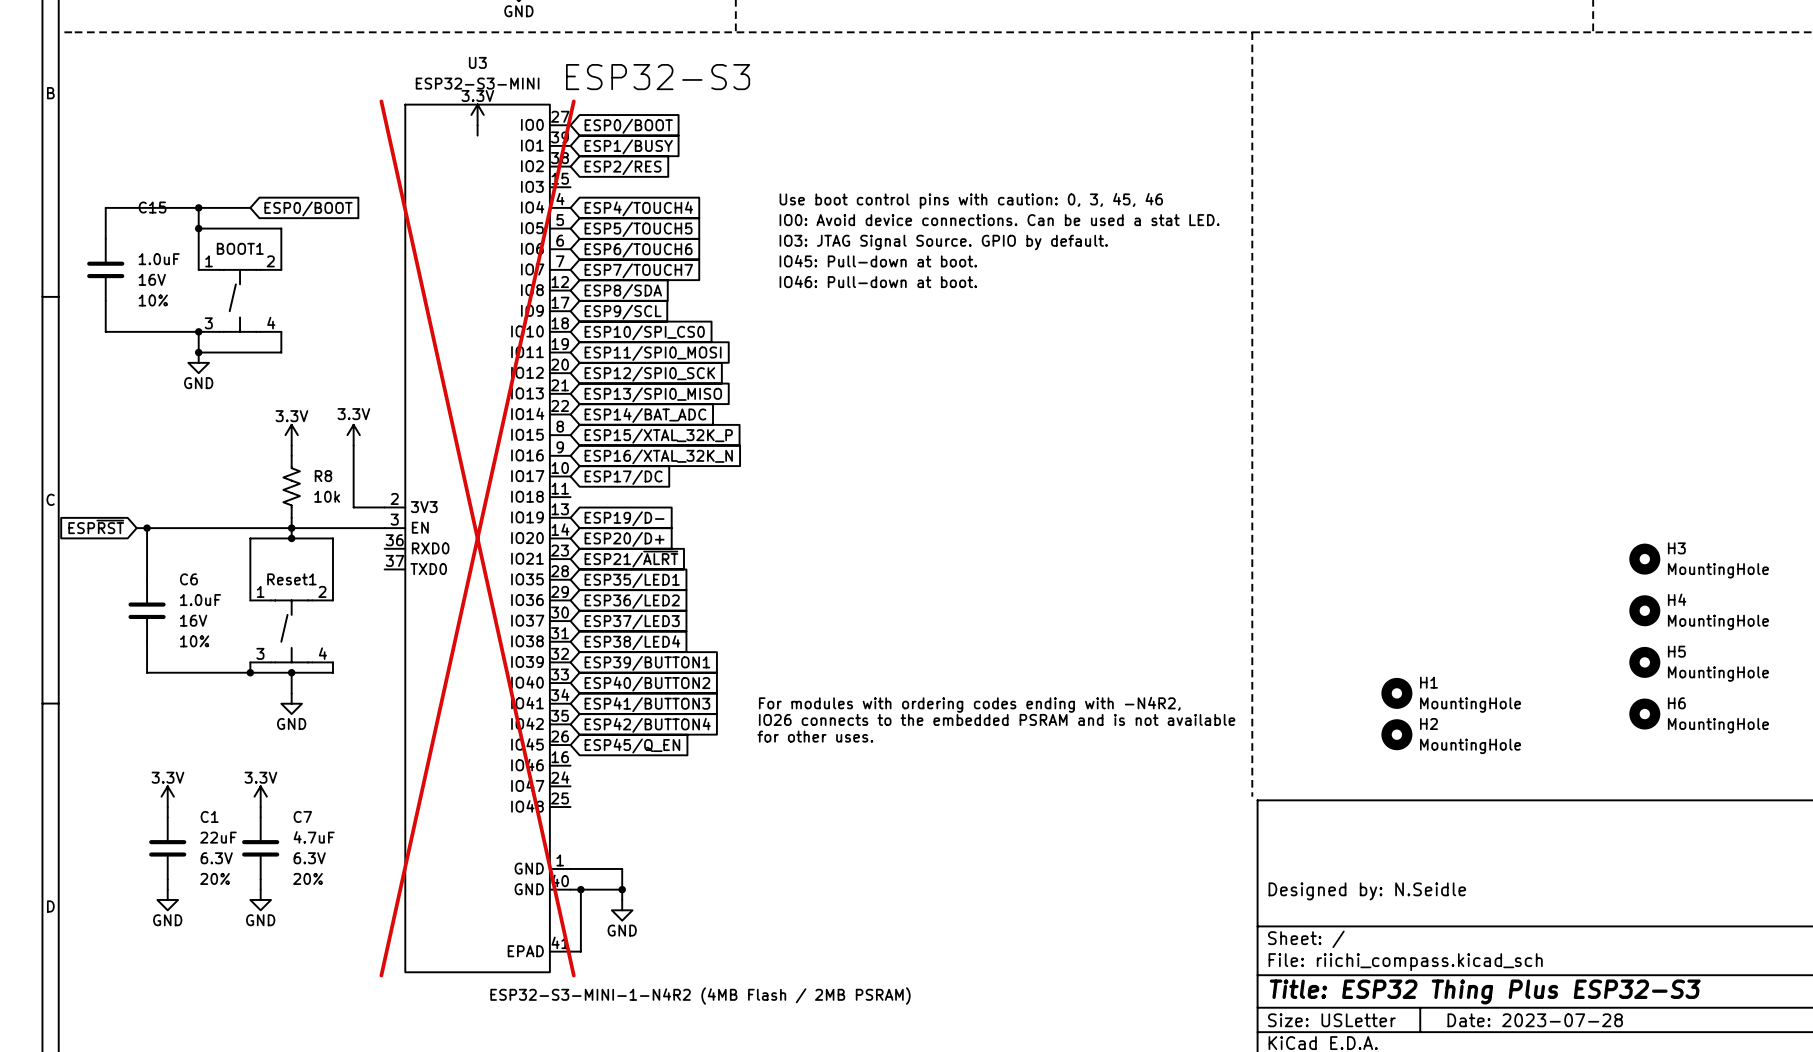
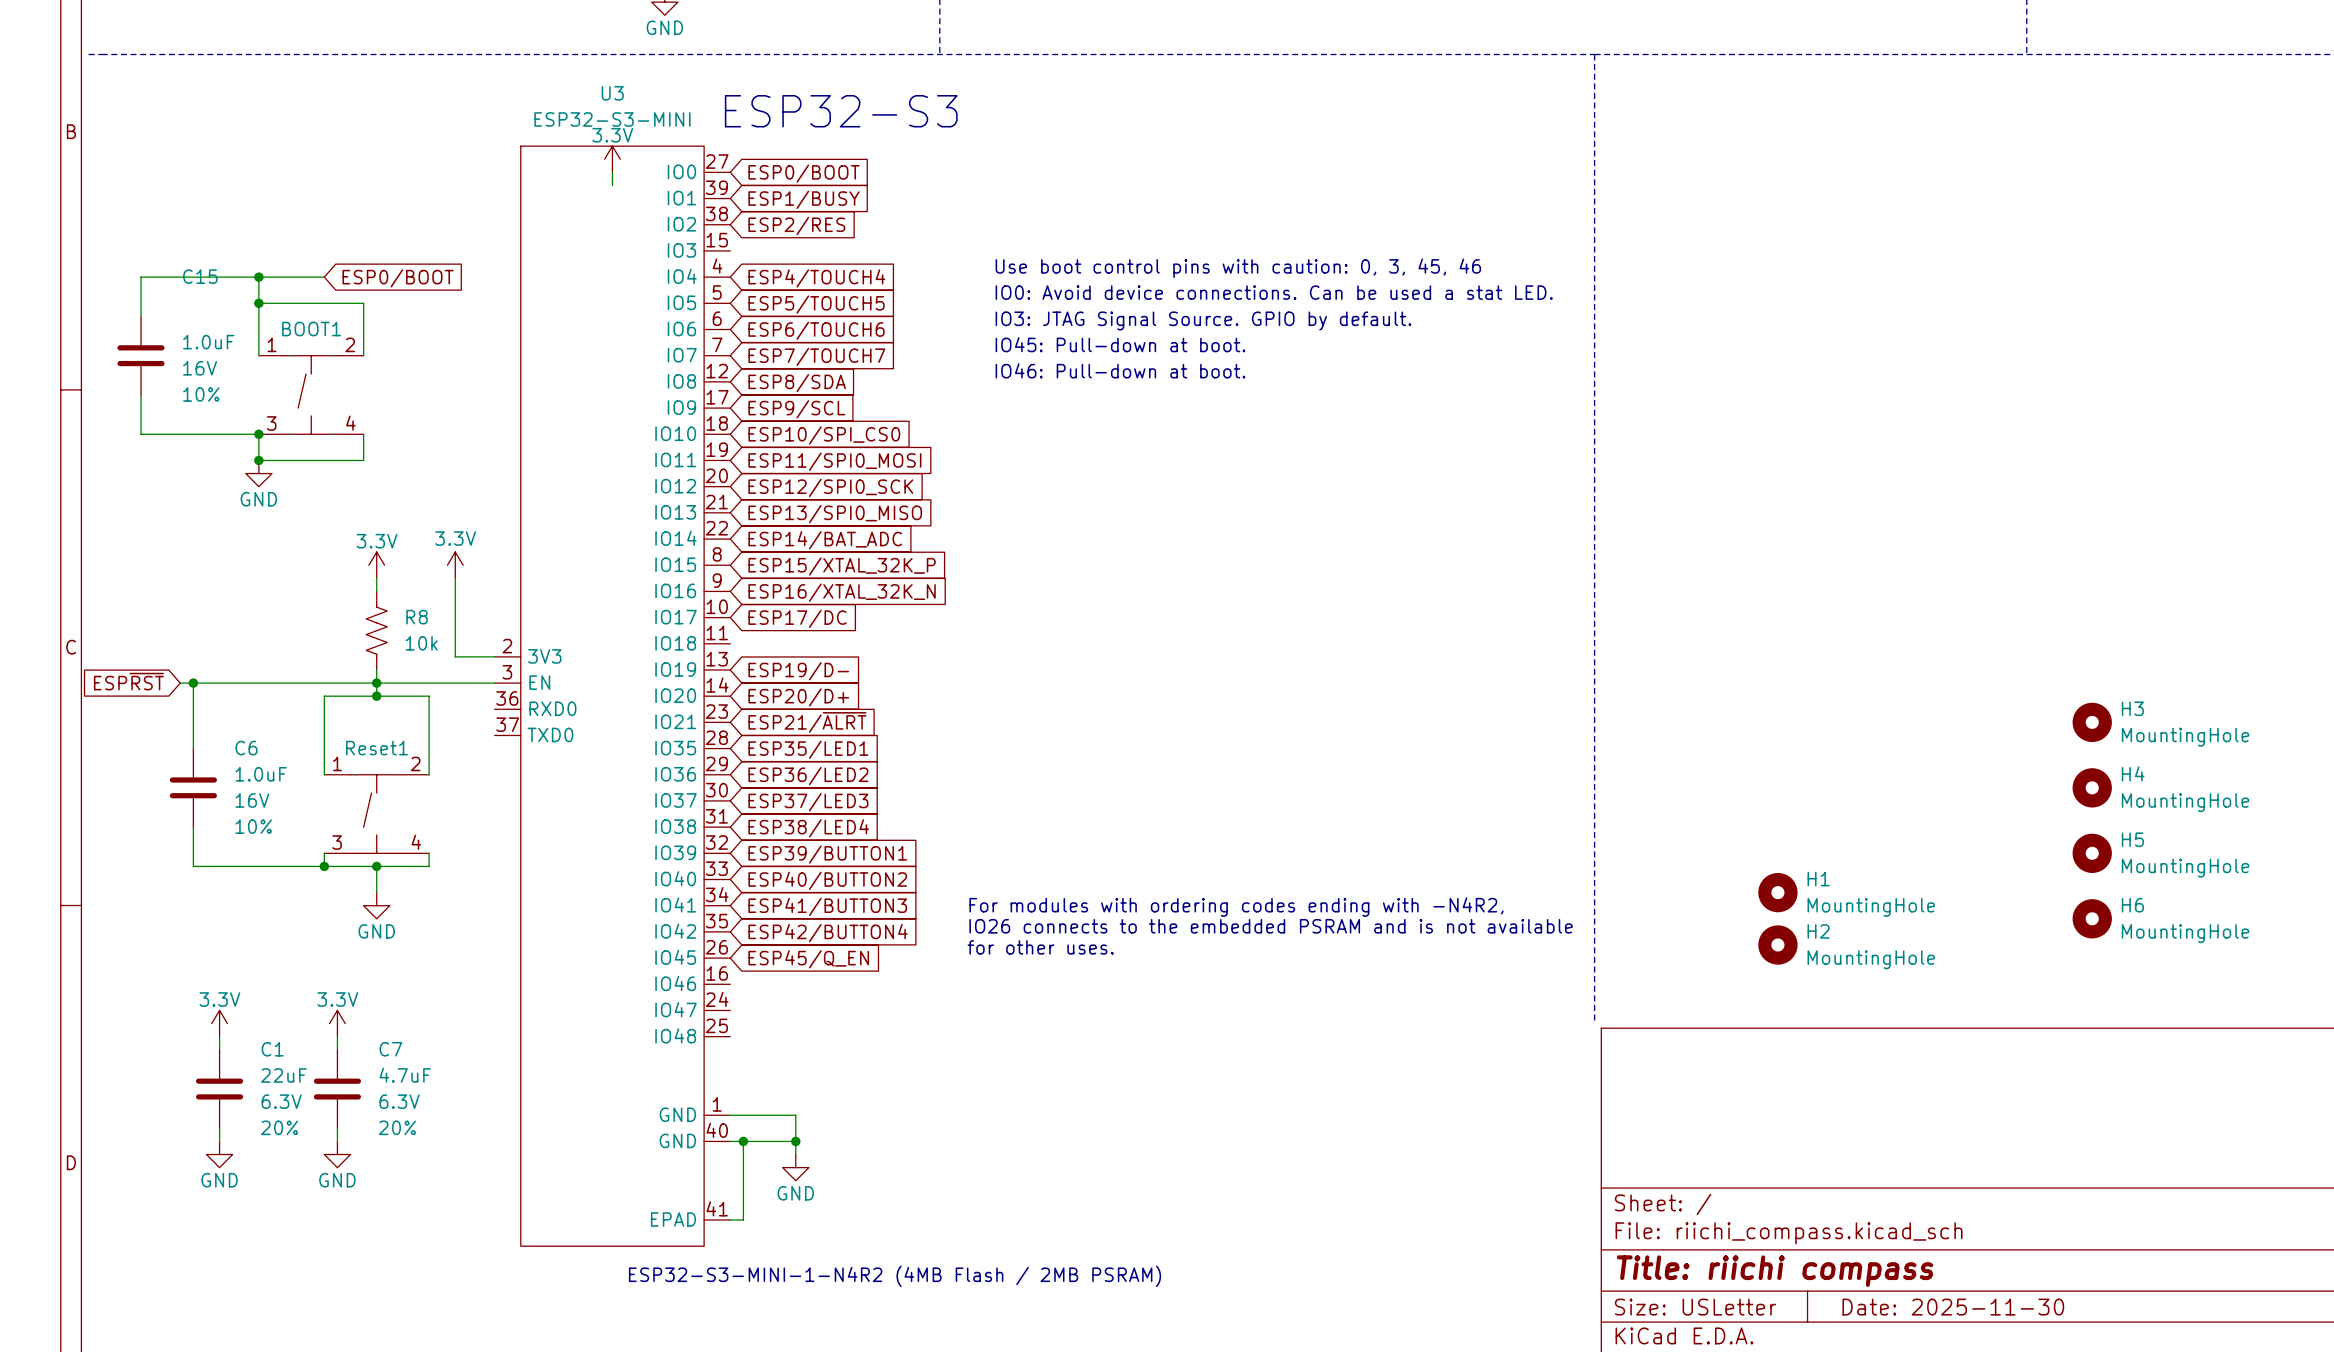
U3 do-not-place cross: (477, 538) -> none
title block: Designed by: N.Seidle (1367, 891) -> none
title block: Title: ESP32 Thing Plus ESP32-S3 (1485, 991) -> Title: riichi compass (1775, 1271)
title block: Date: 2023-07-28 (1535, 1020) -> Date: 2025-11-30 (1953, 1307)

